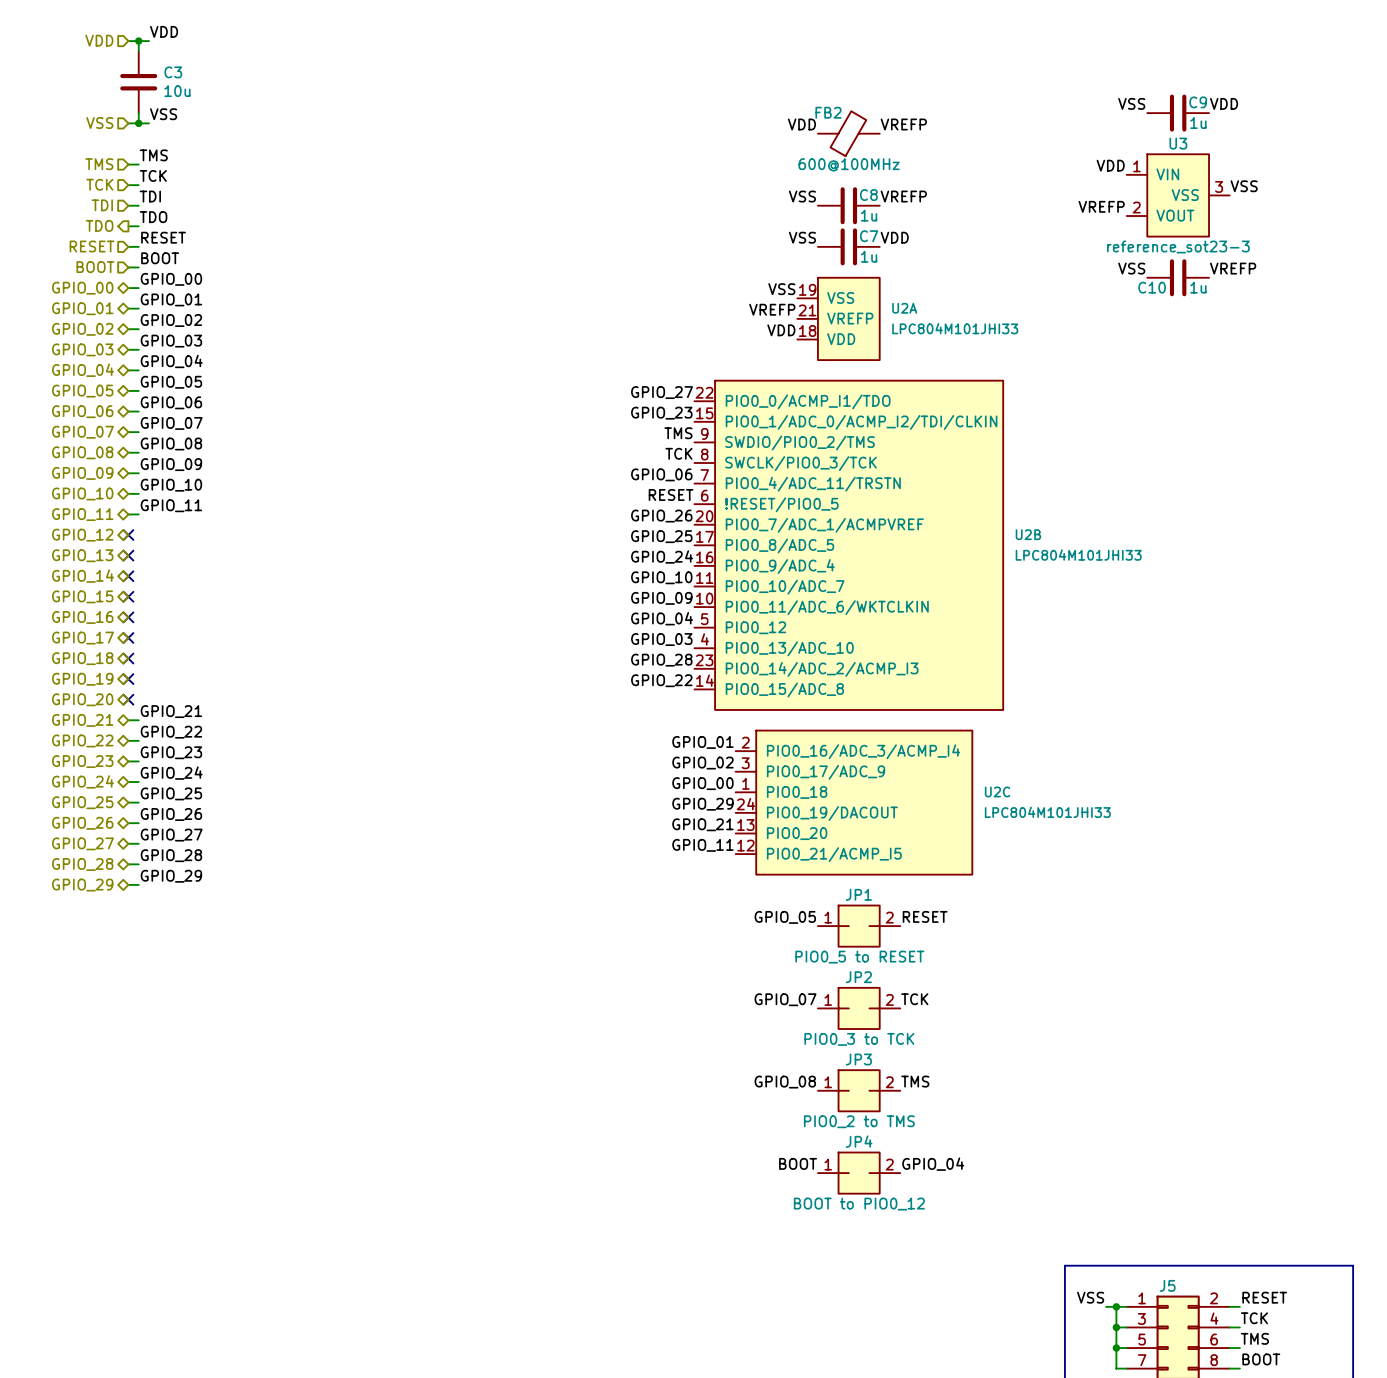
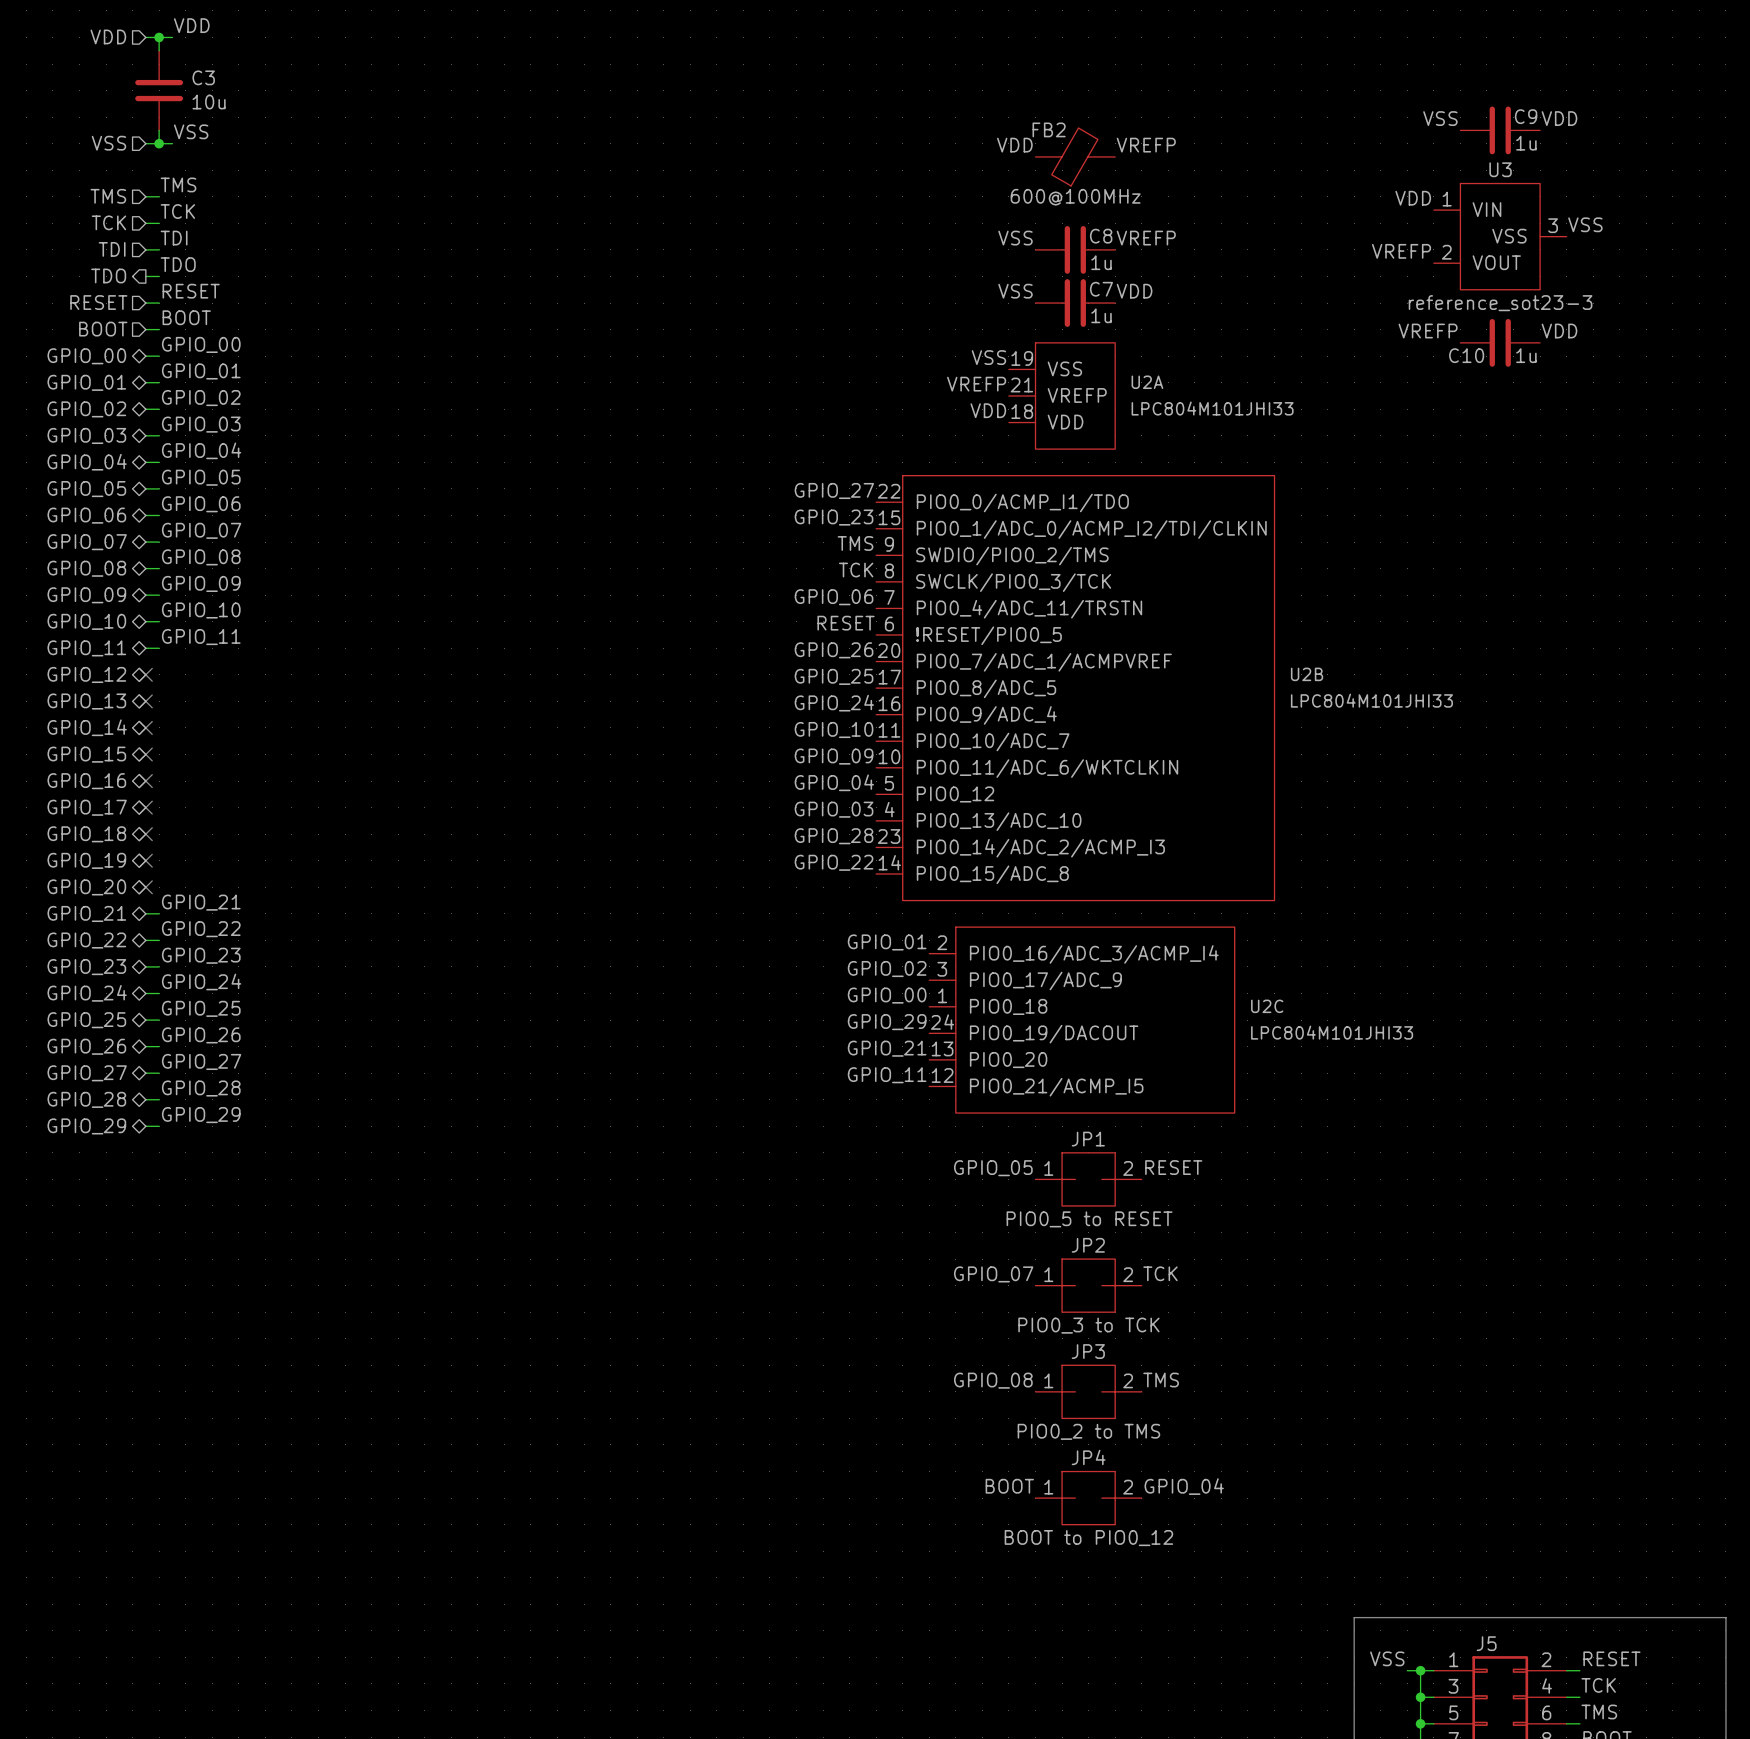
label: VSS (1131, 268) -> VREFP (1428, 331)
label: VREFP (1233, 268) -> VDD (1559, 331)

